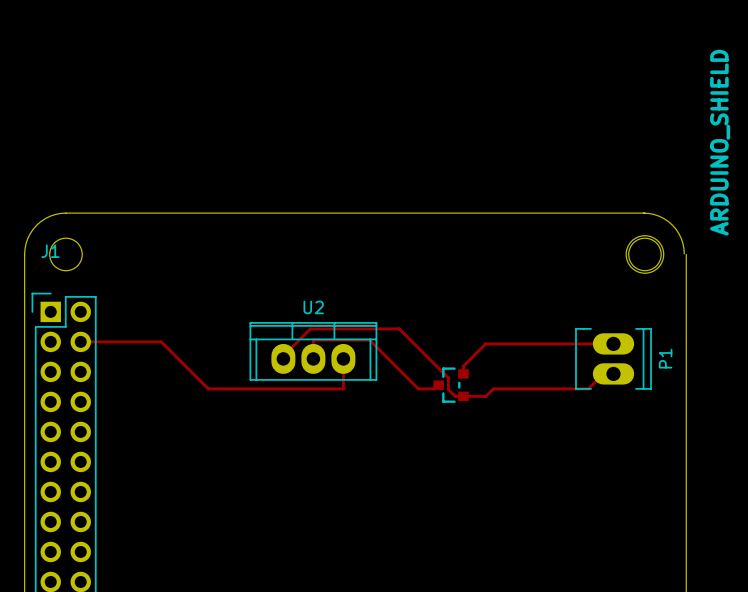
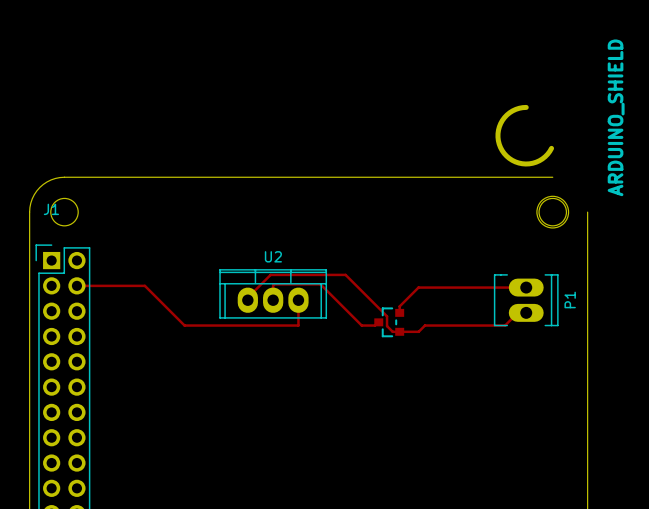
board edge: none -> (526, 107) (509, 112) (500, 123) (497, 137) (502, 150) (512, 160) (525, 164) (542, 158) (551, 148)
board edge: (643, 213) (659, 216) (672, 225) (681, 238) (684, 253) -> none

